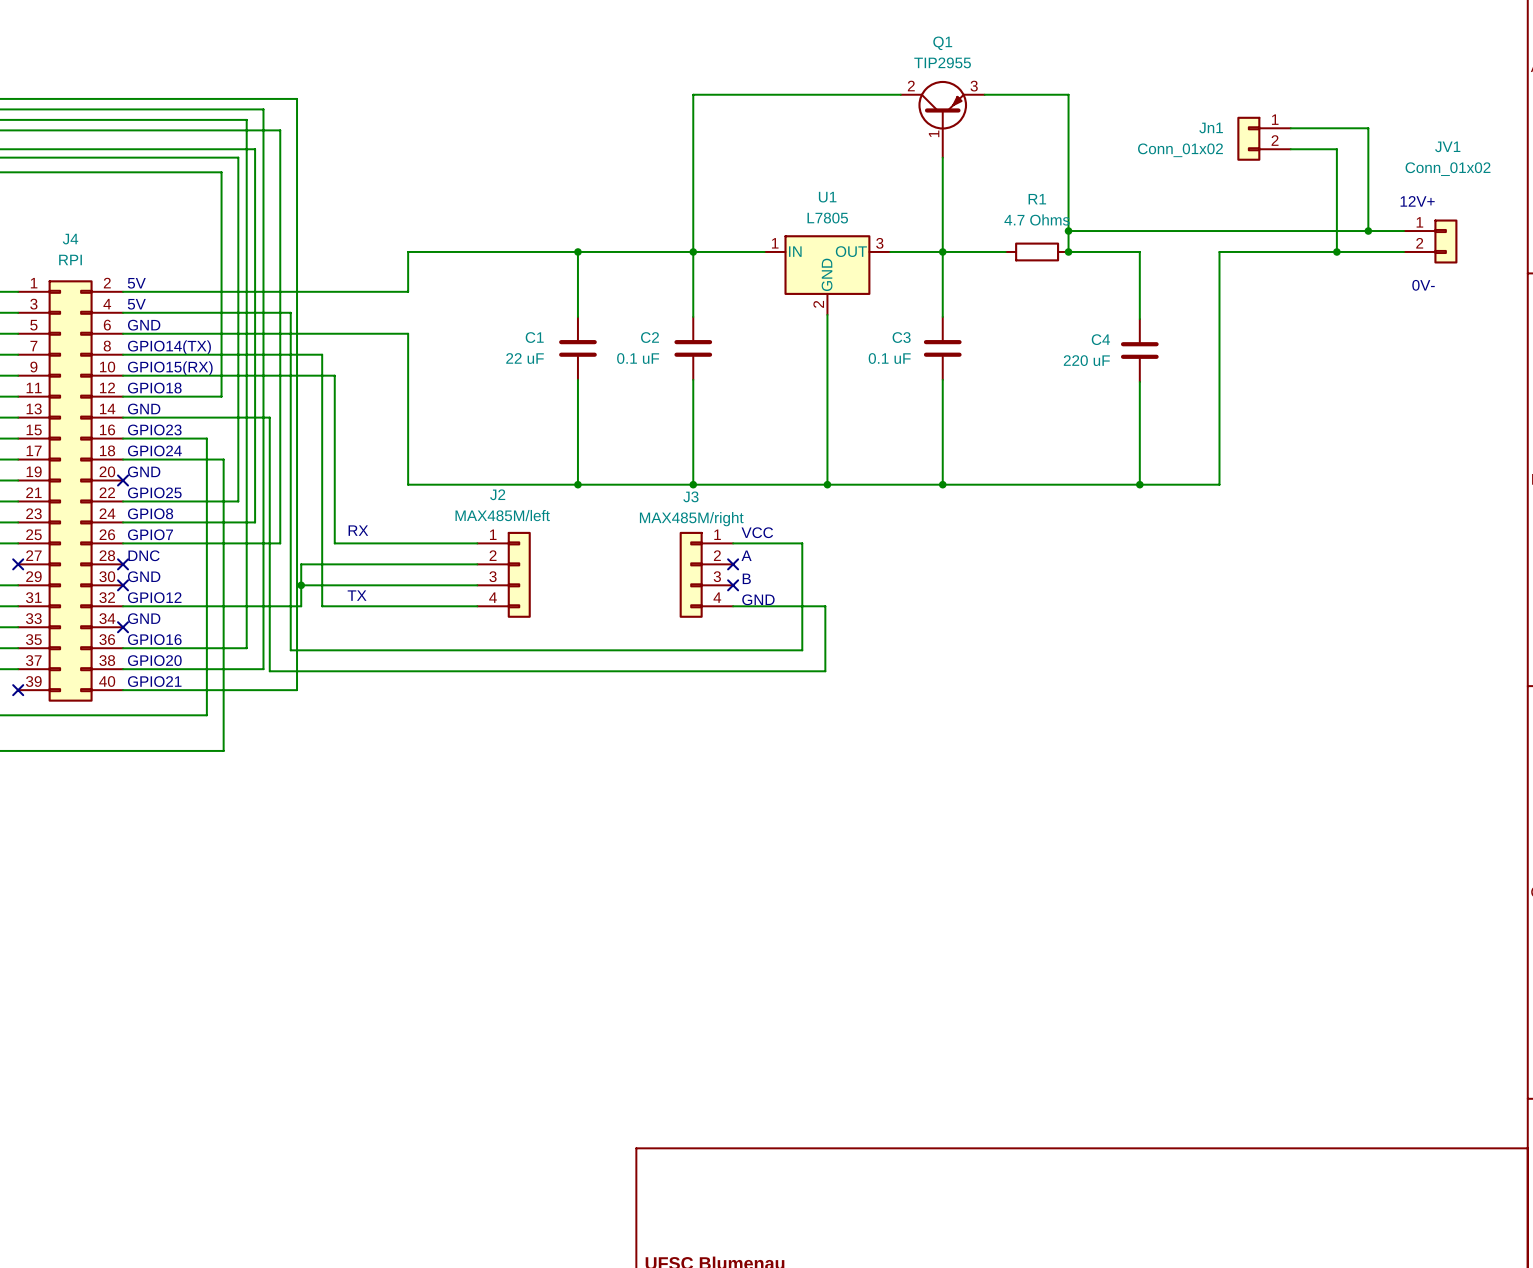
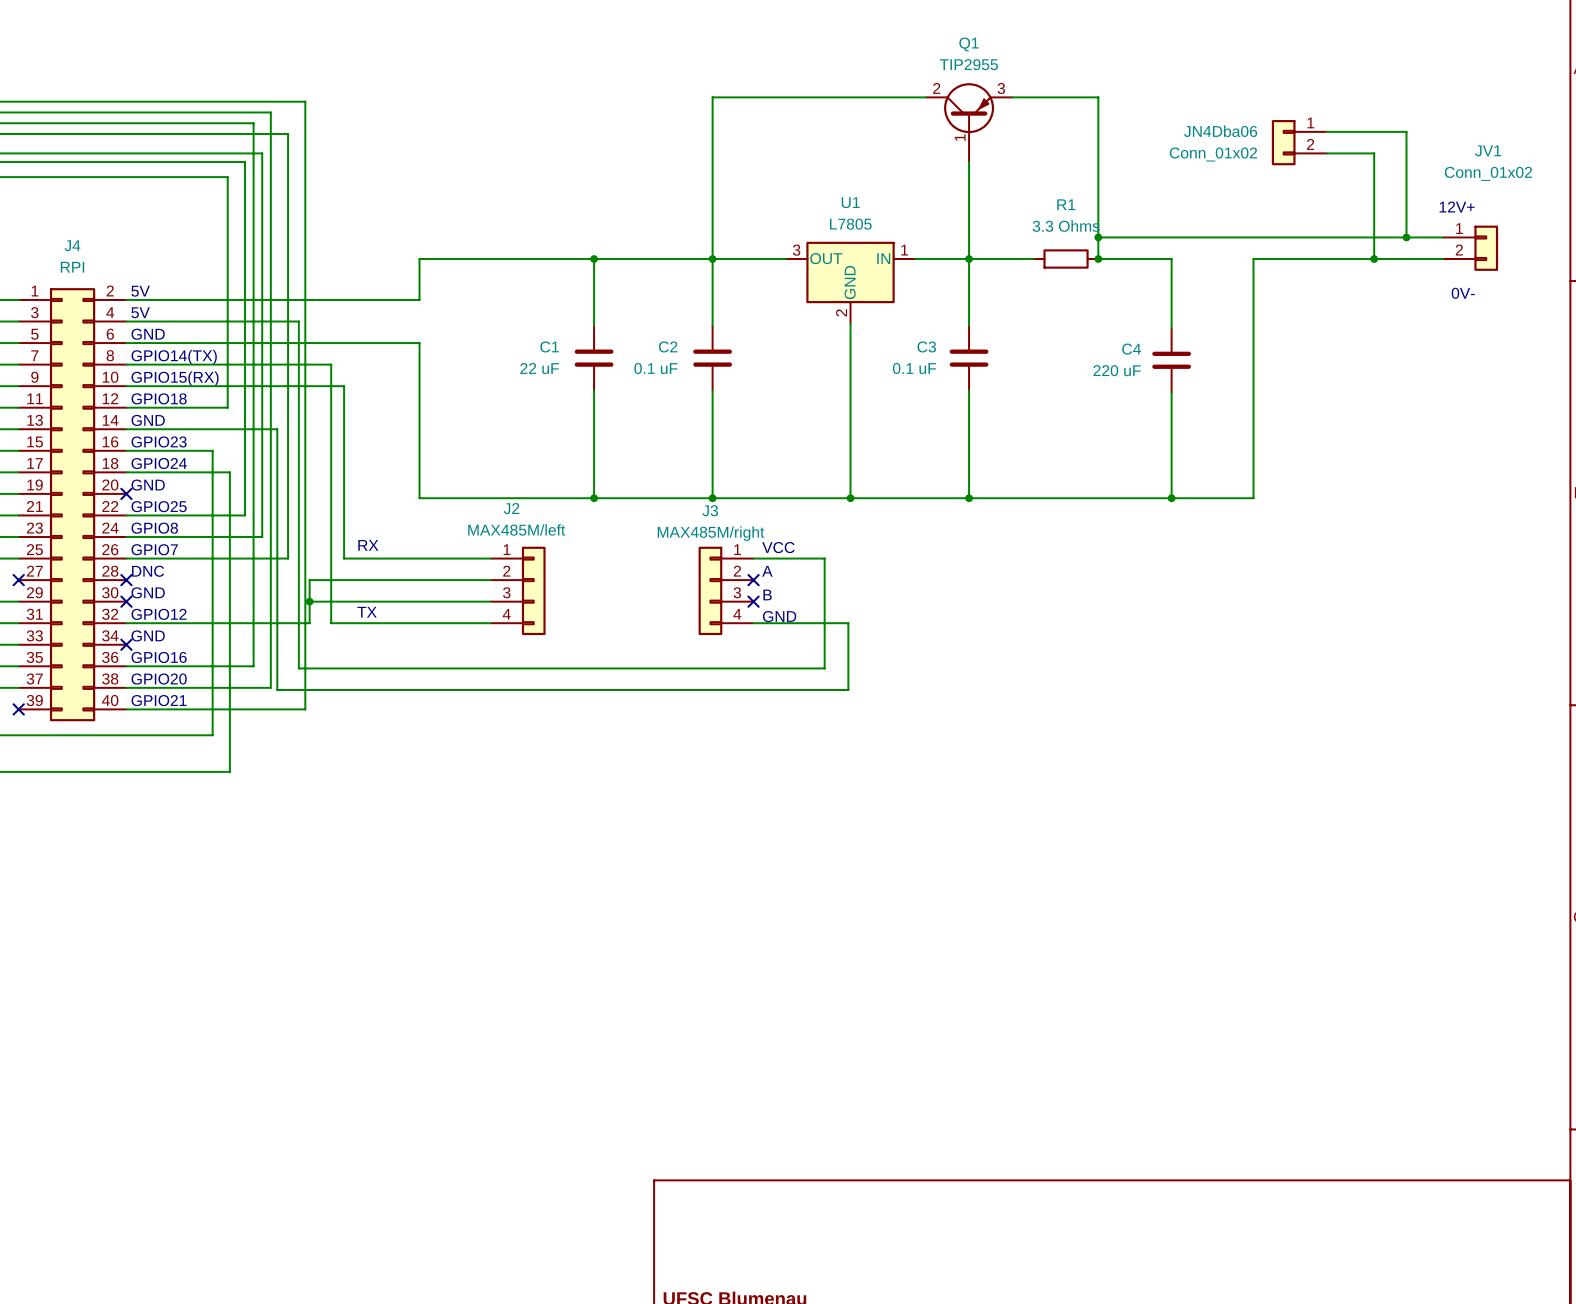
Jn1 name: Jn1 (1211, 127) -> JN4Dba06 (1220, 131)
R1 value: 4.7 Ohms (1036, 219) -> 3.3 Ohms (1066, 226)
U1 flip: as is (827, 265) -> left-right (850, 272)

